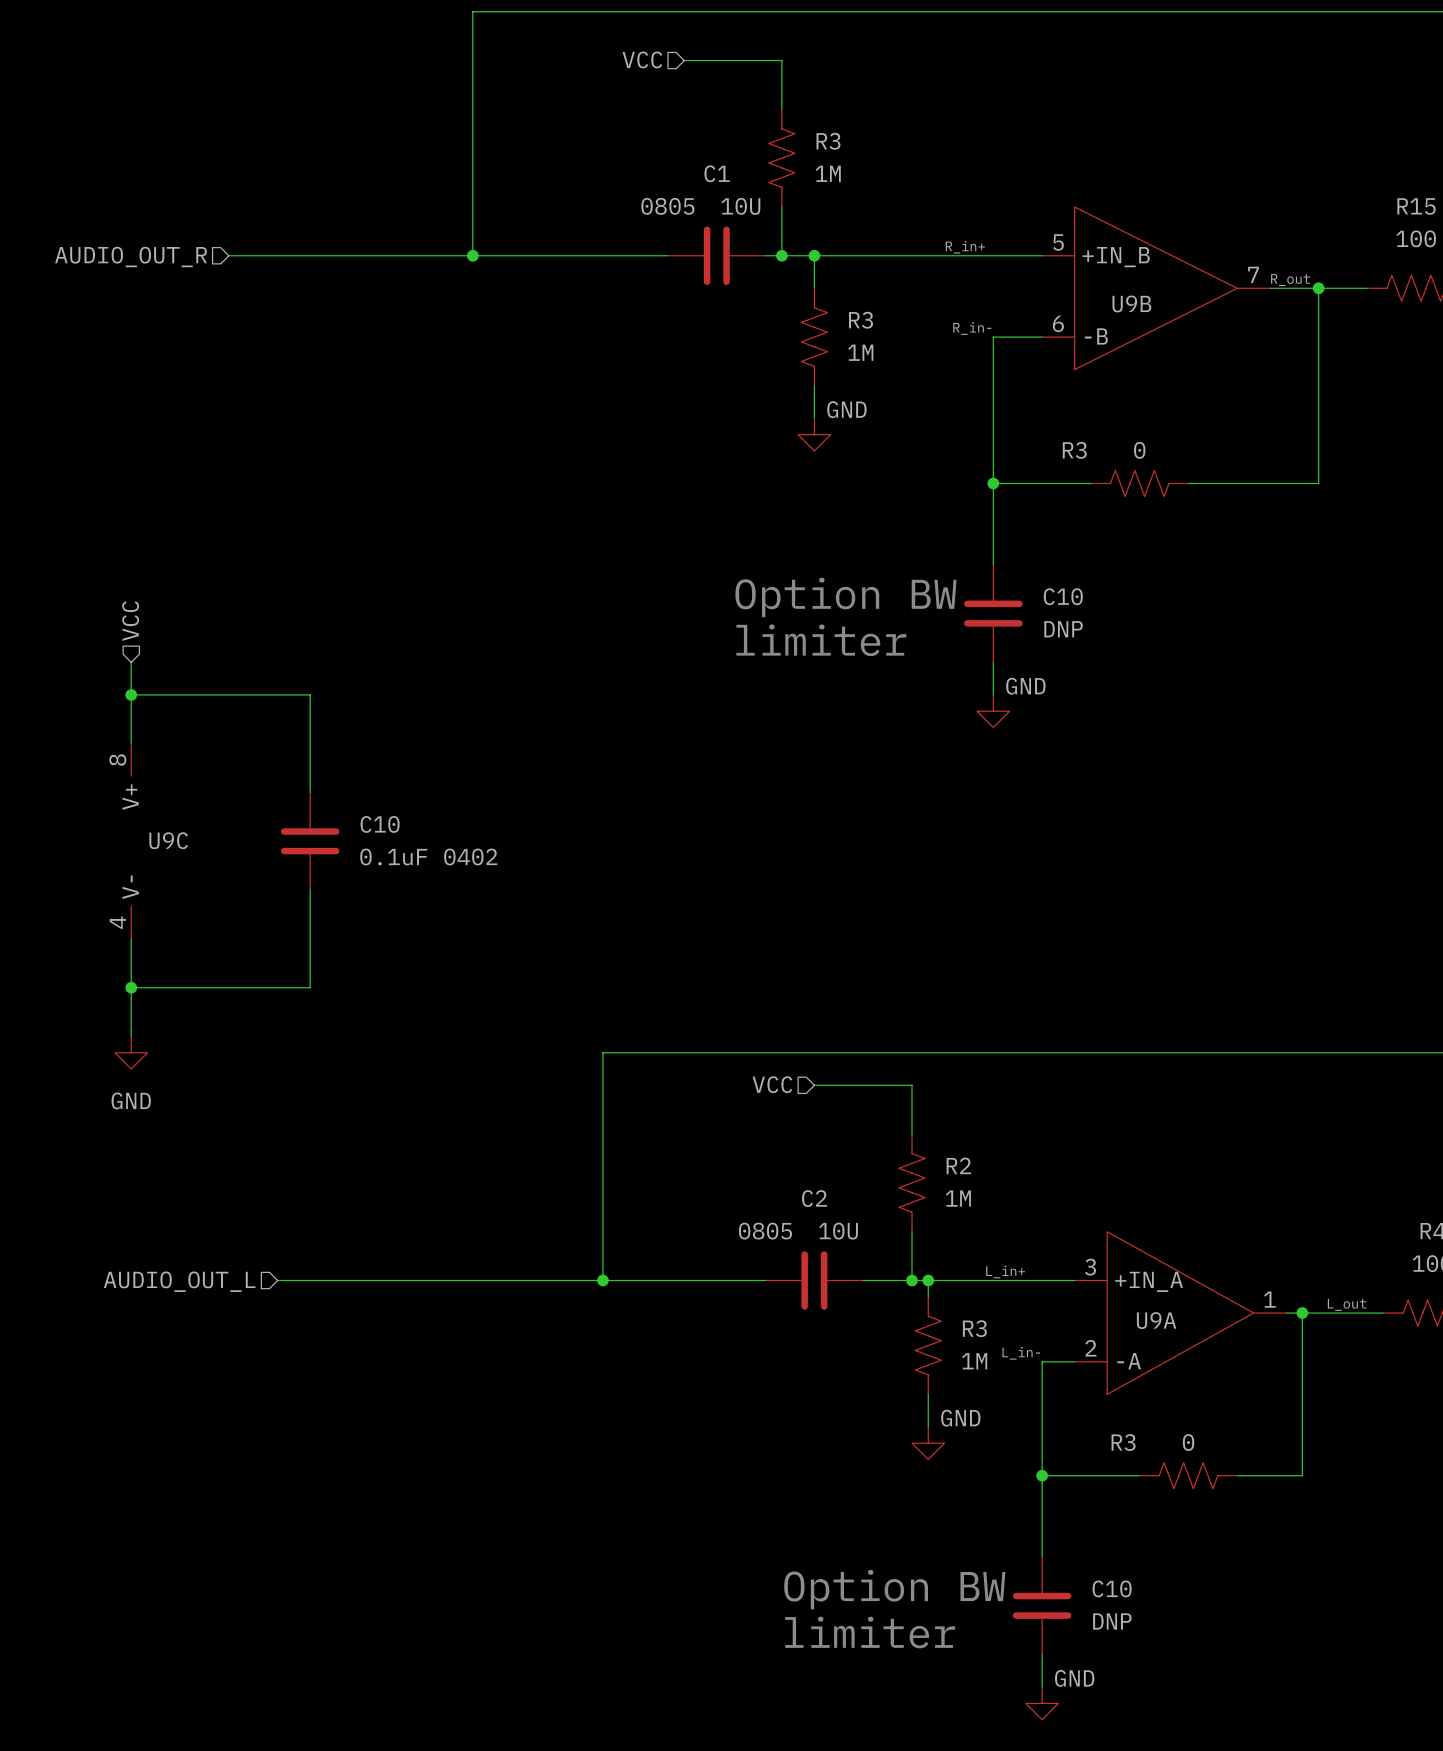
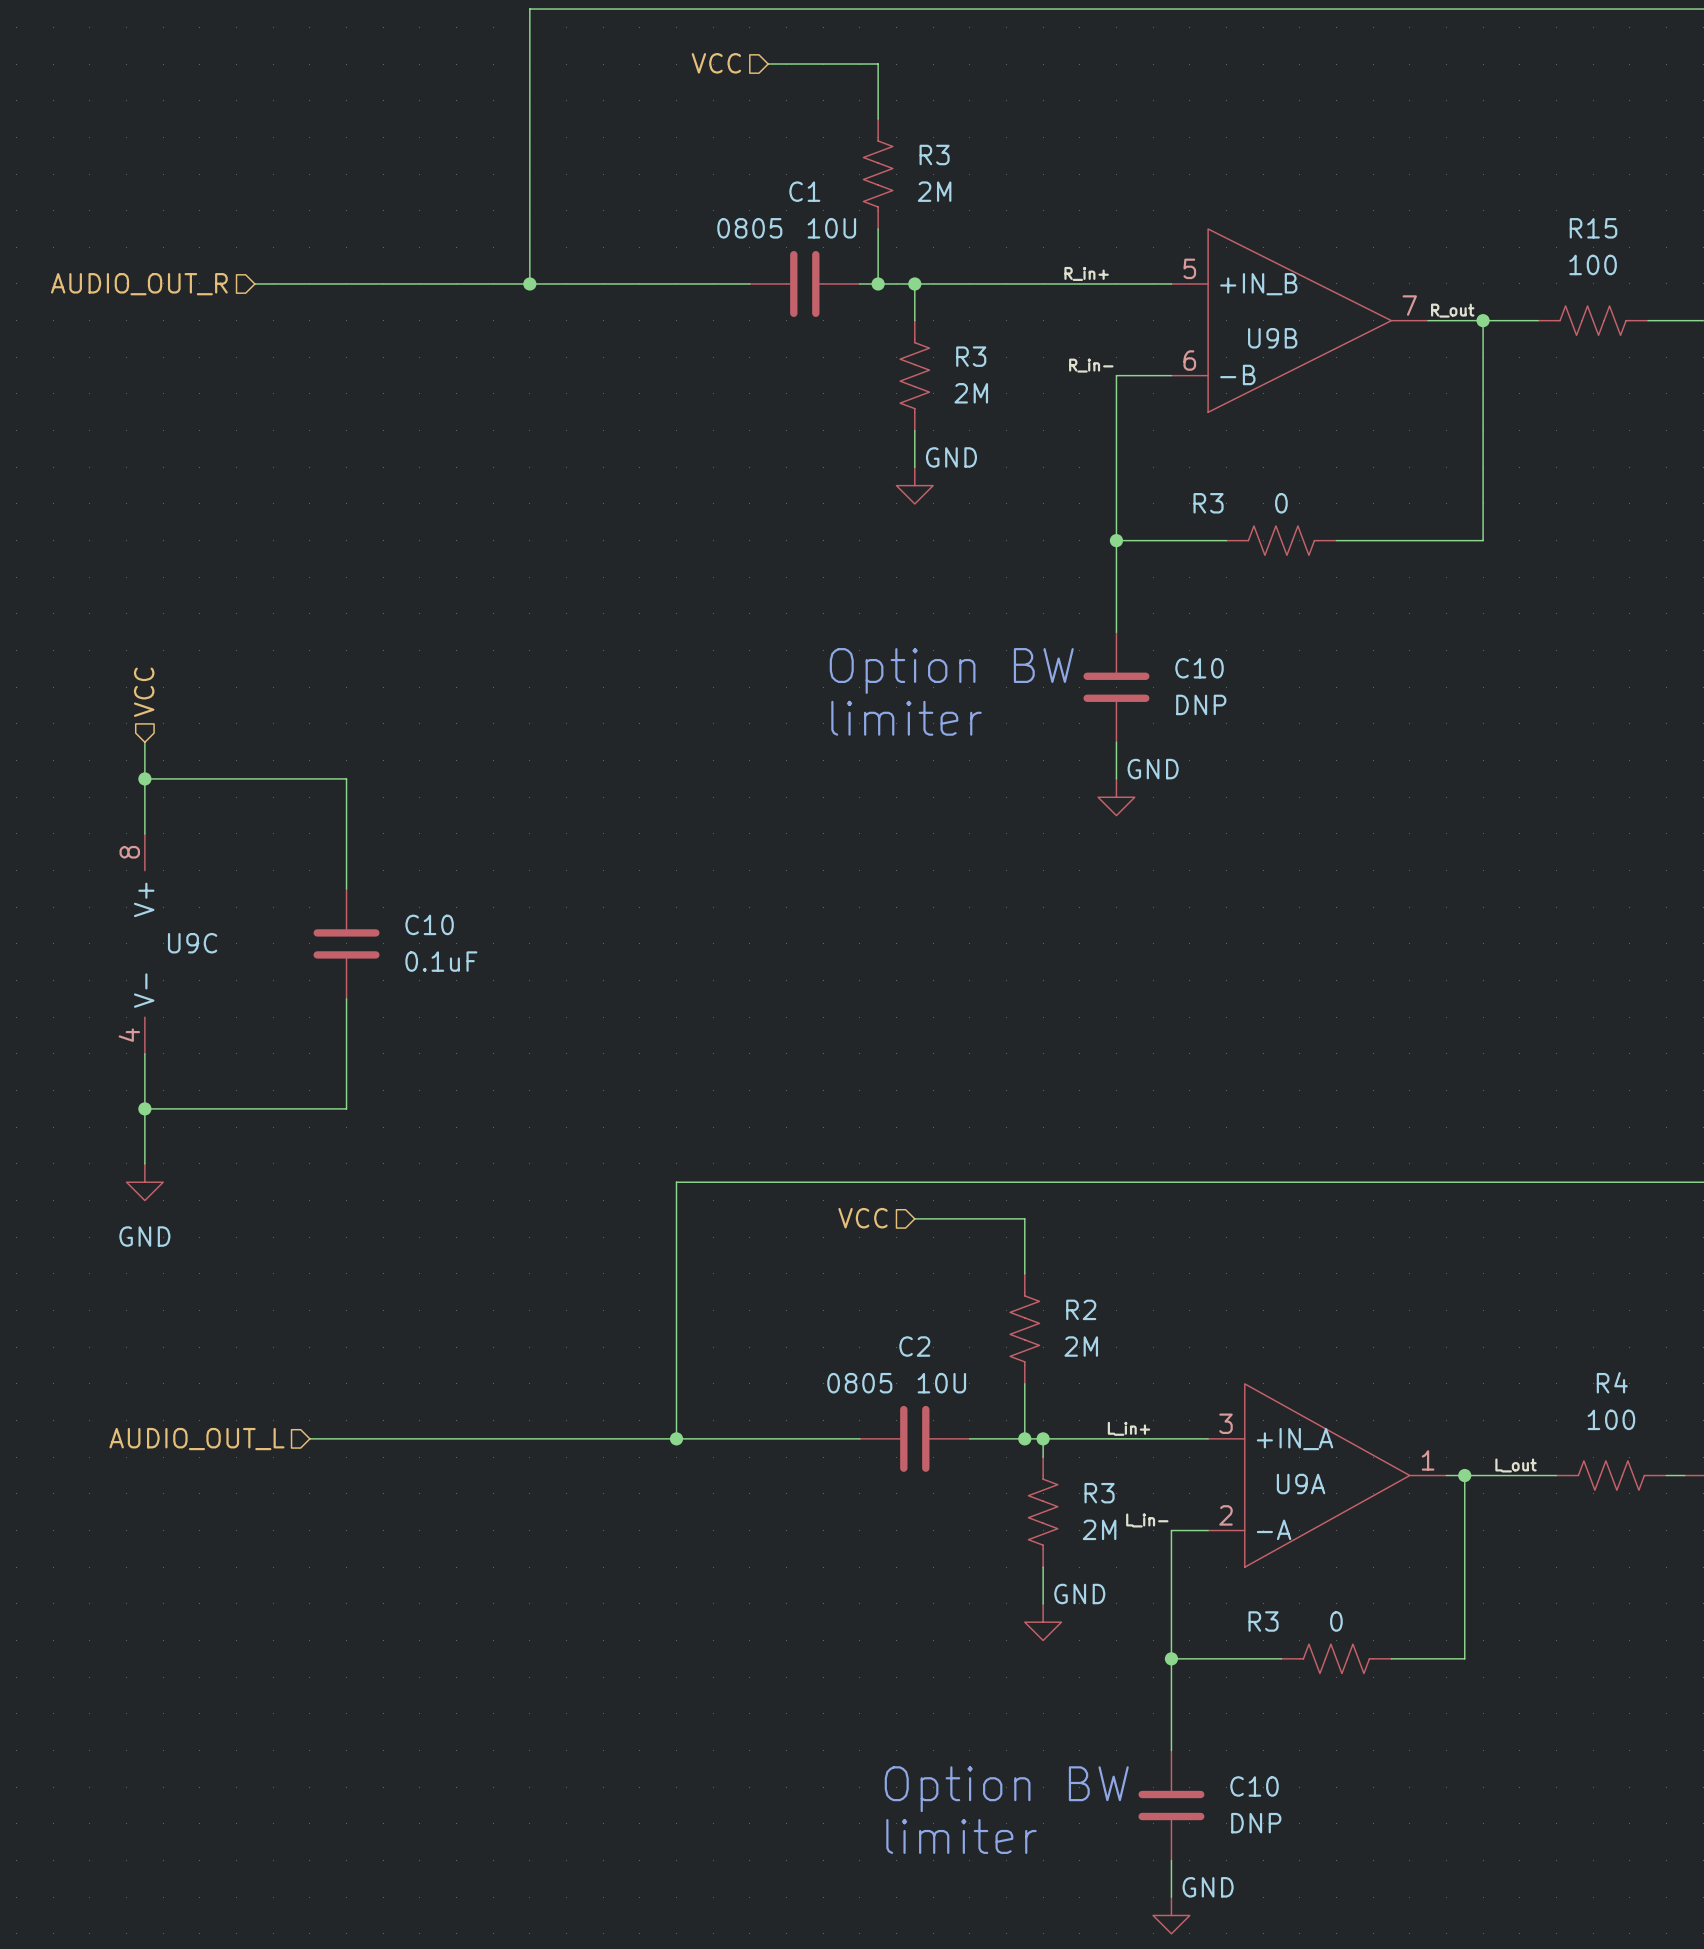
R3 value: 1M (828, 173) -> 2M (934, 191)
R3 value: 1M (860, 352) -> 2M (971, 393)
C10 value: 0.1uF 0402 (428, 856) -> 0.1uF (441, 961)
R2 value: 1M (958, 1198) -> 2M (1081, 1346)
R3 value: 1M (974, 1361) -> 2M (1099, 1529)

